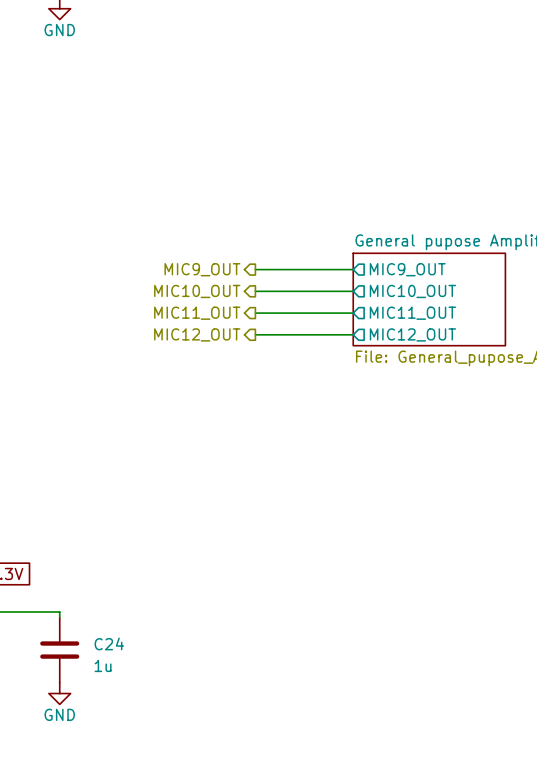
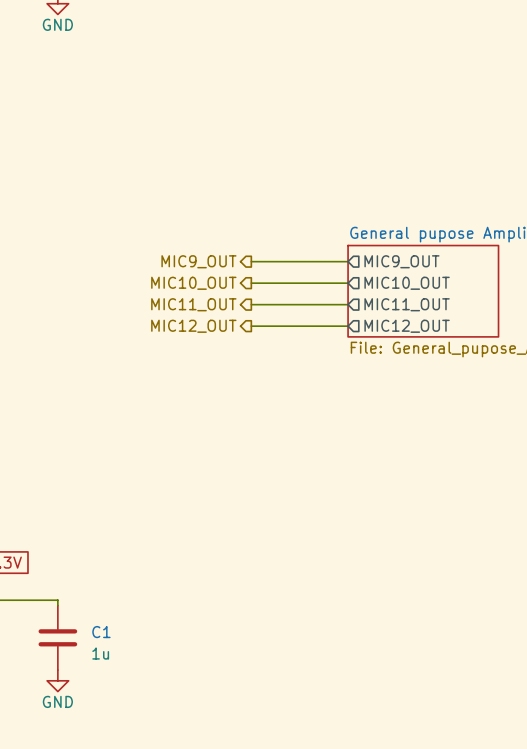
C24 name: C24 (109, 643) -> C1 (101, 632)

